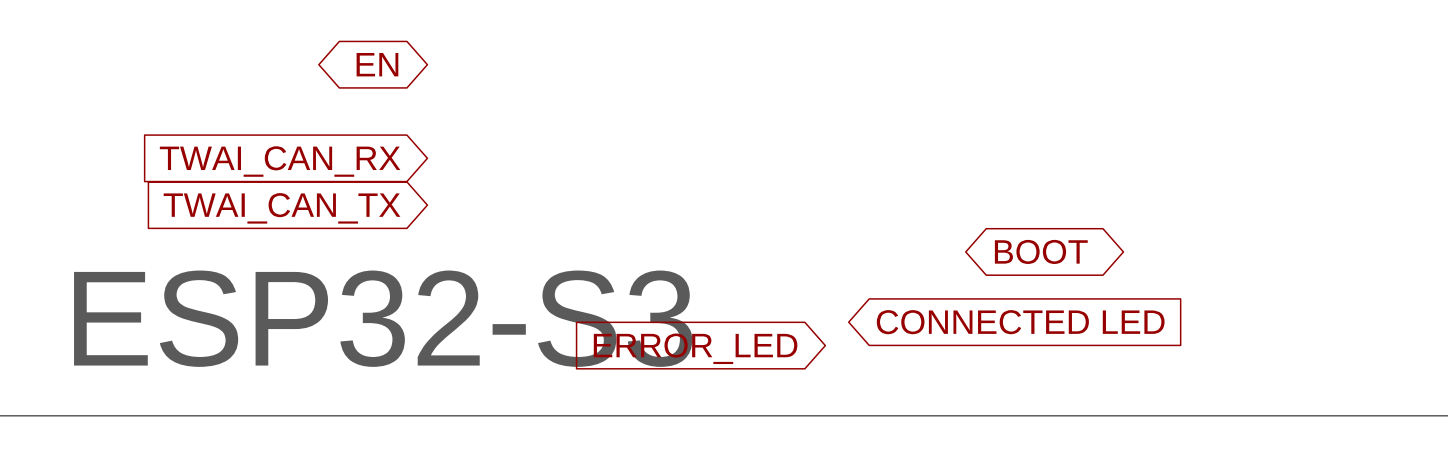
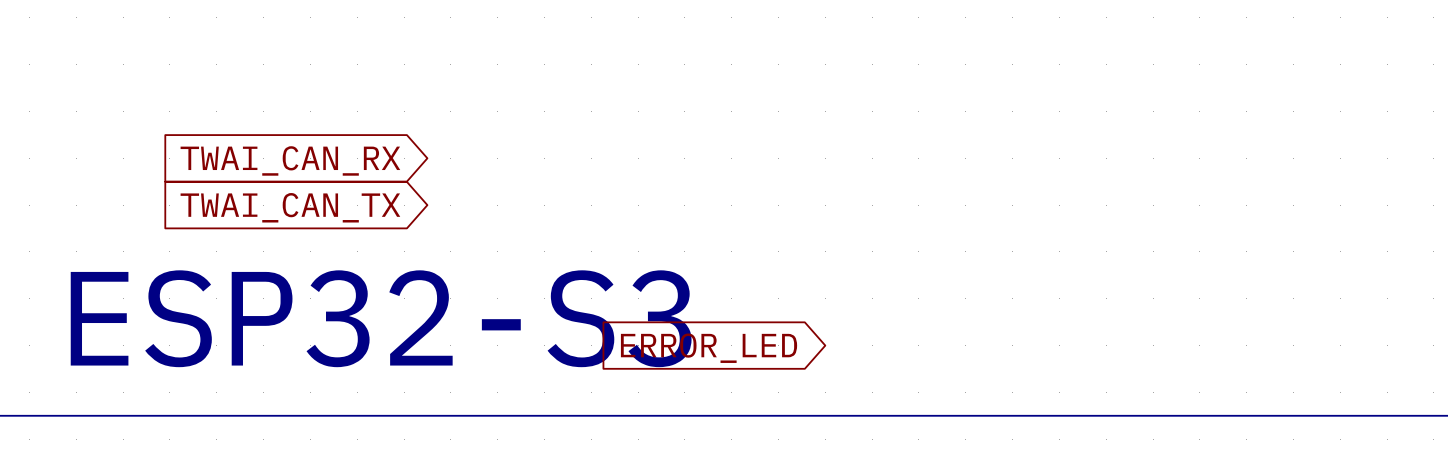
global label: EN (377, 64) -> none
global label: BOOT (1041, 251) -> none
global label: CONNECTED LED (1020, 322) -> none

